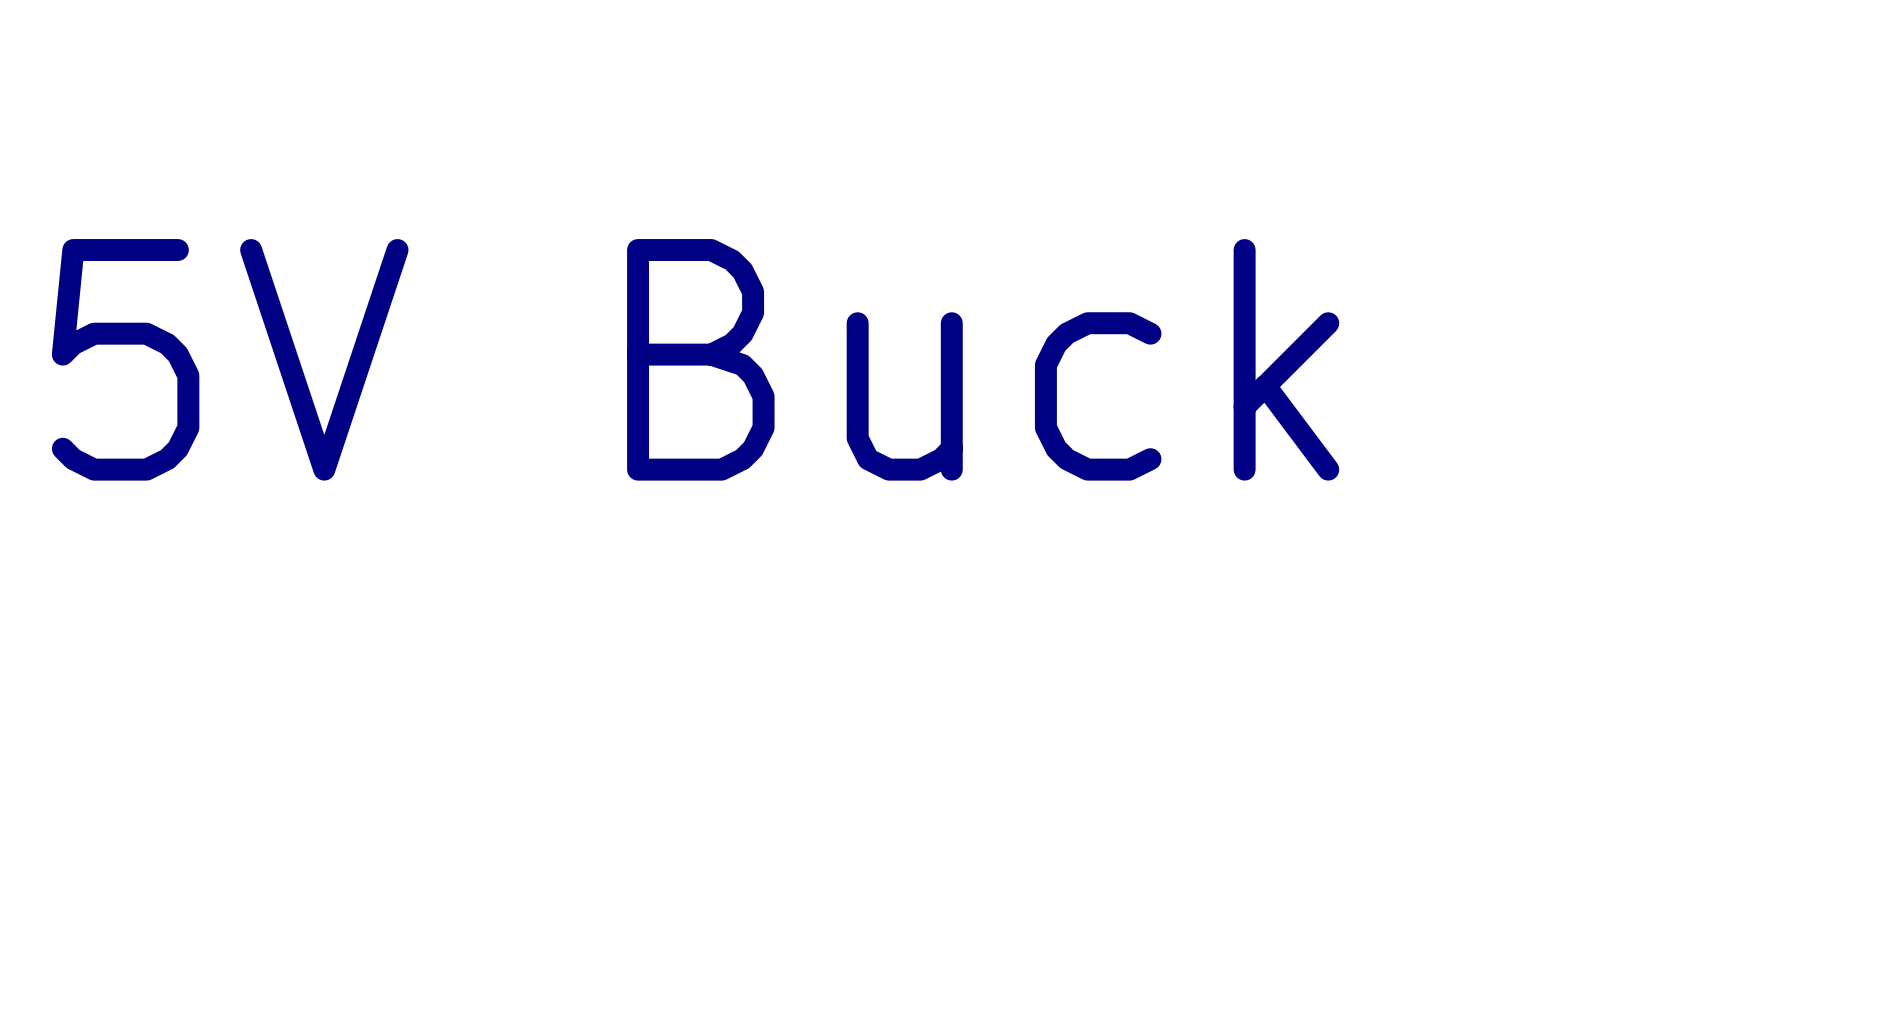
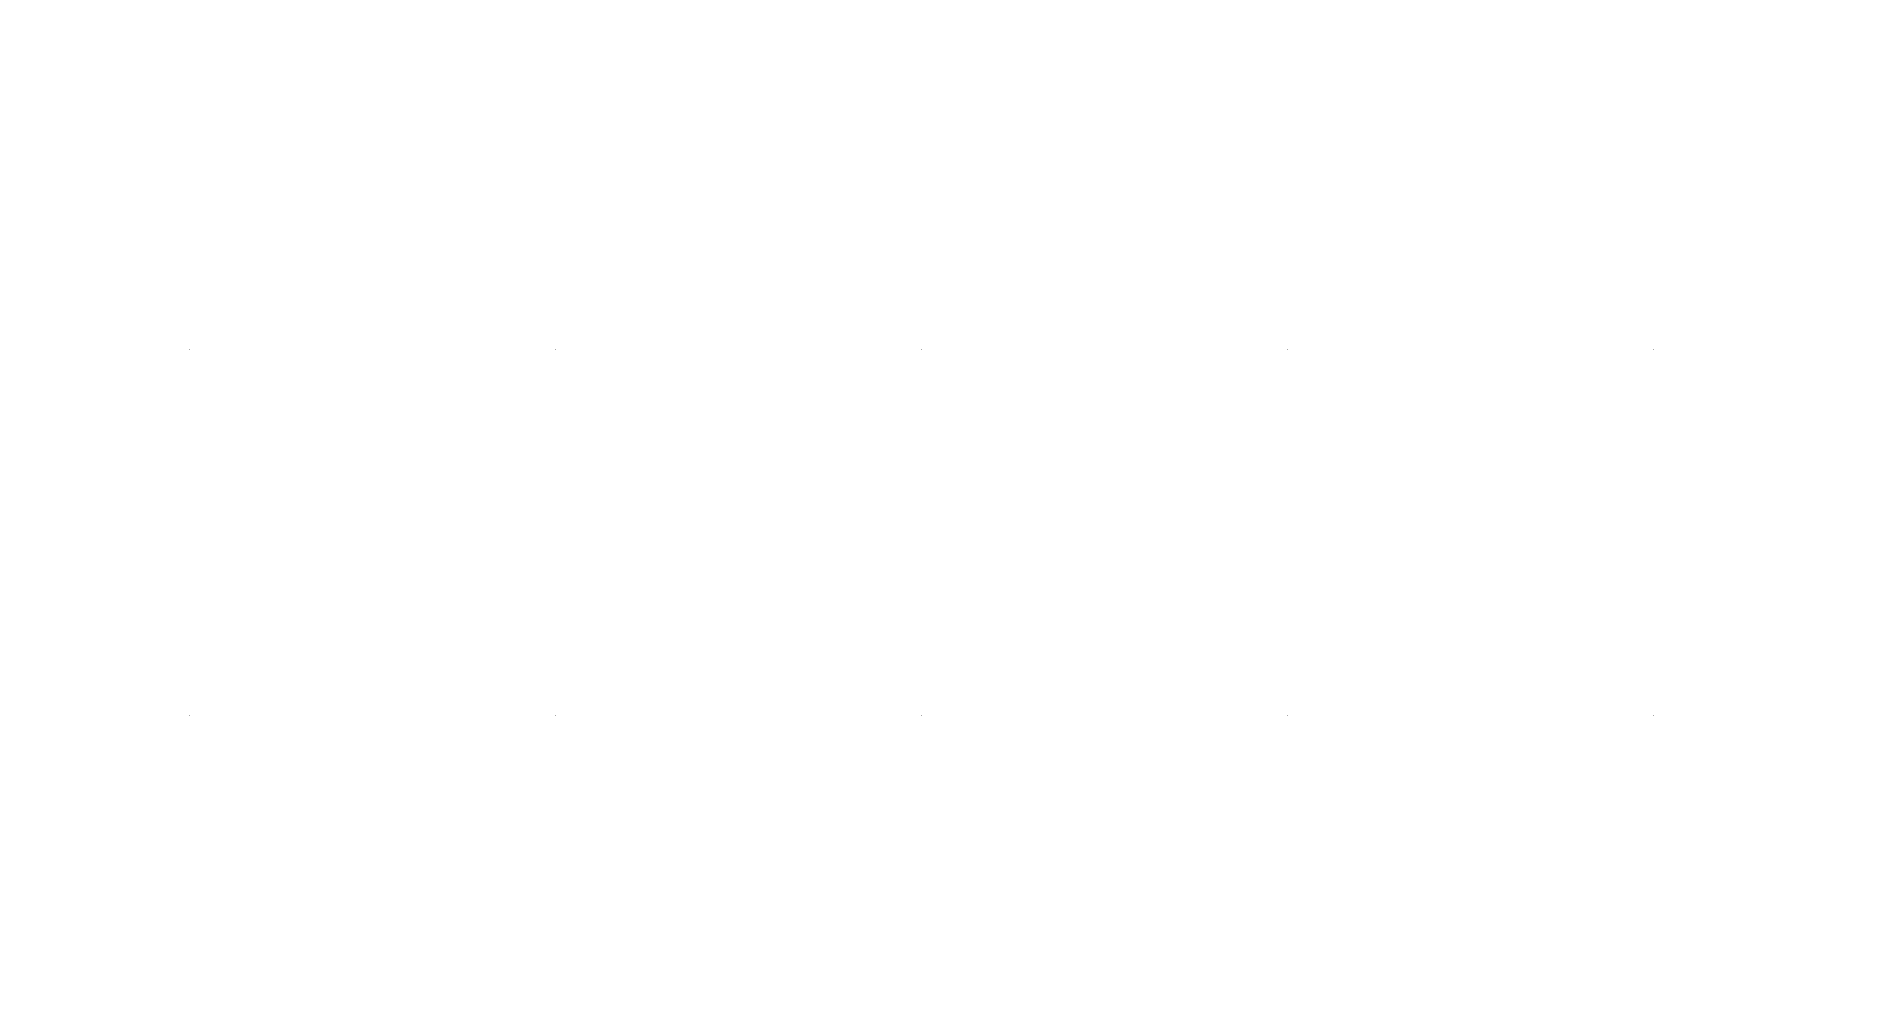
text: 5V Buck (695, 359) -> none

